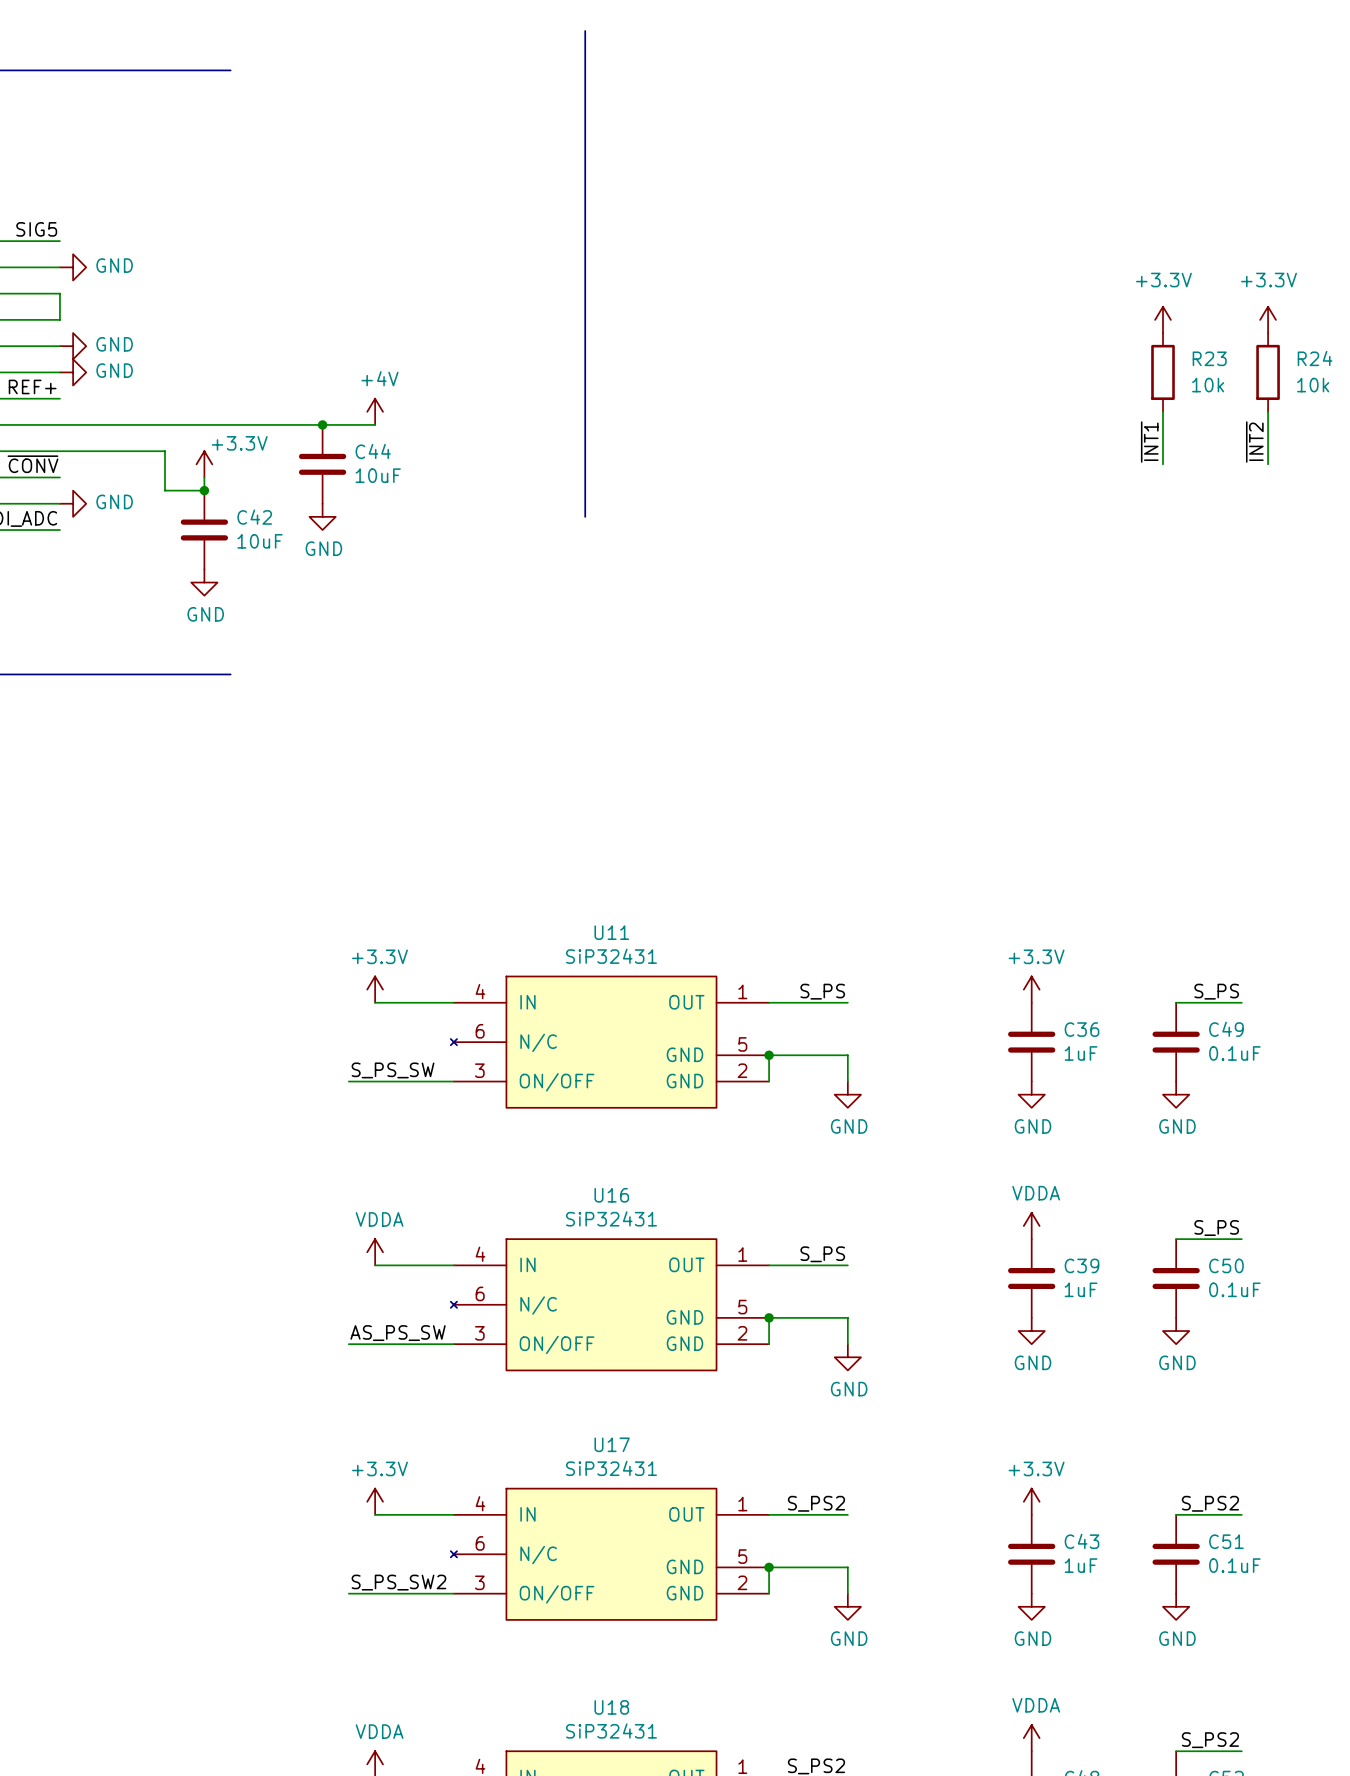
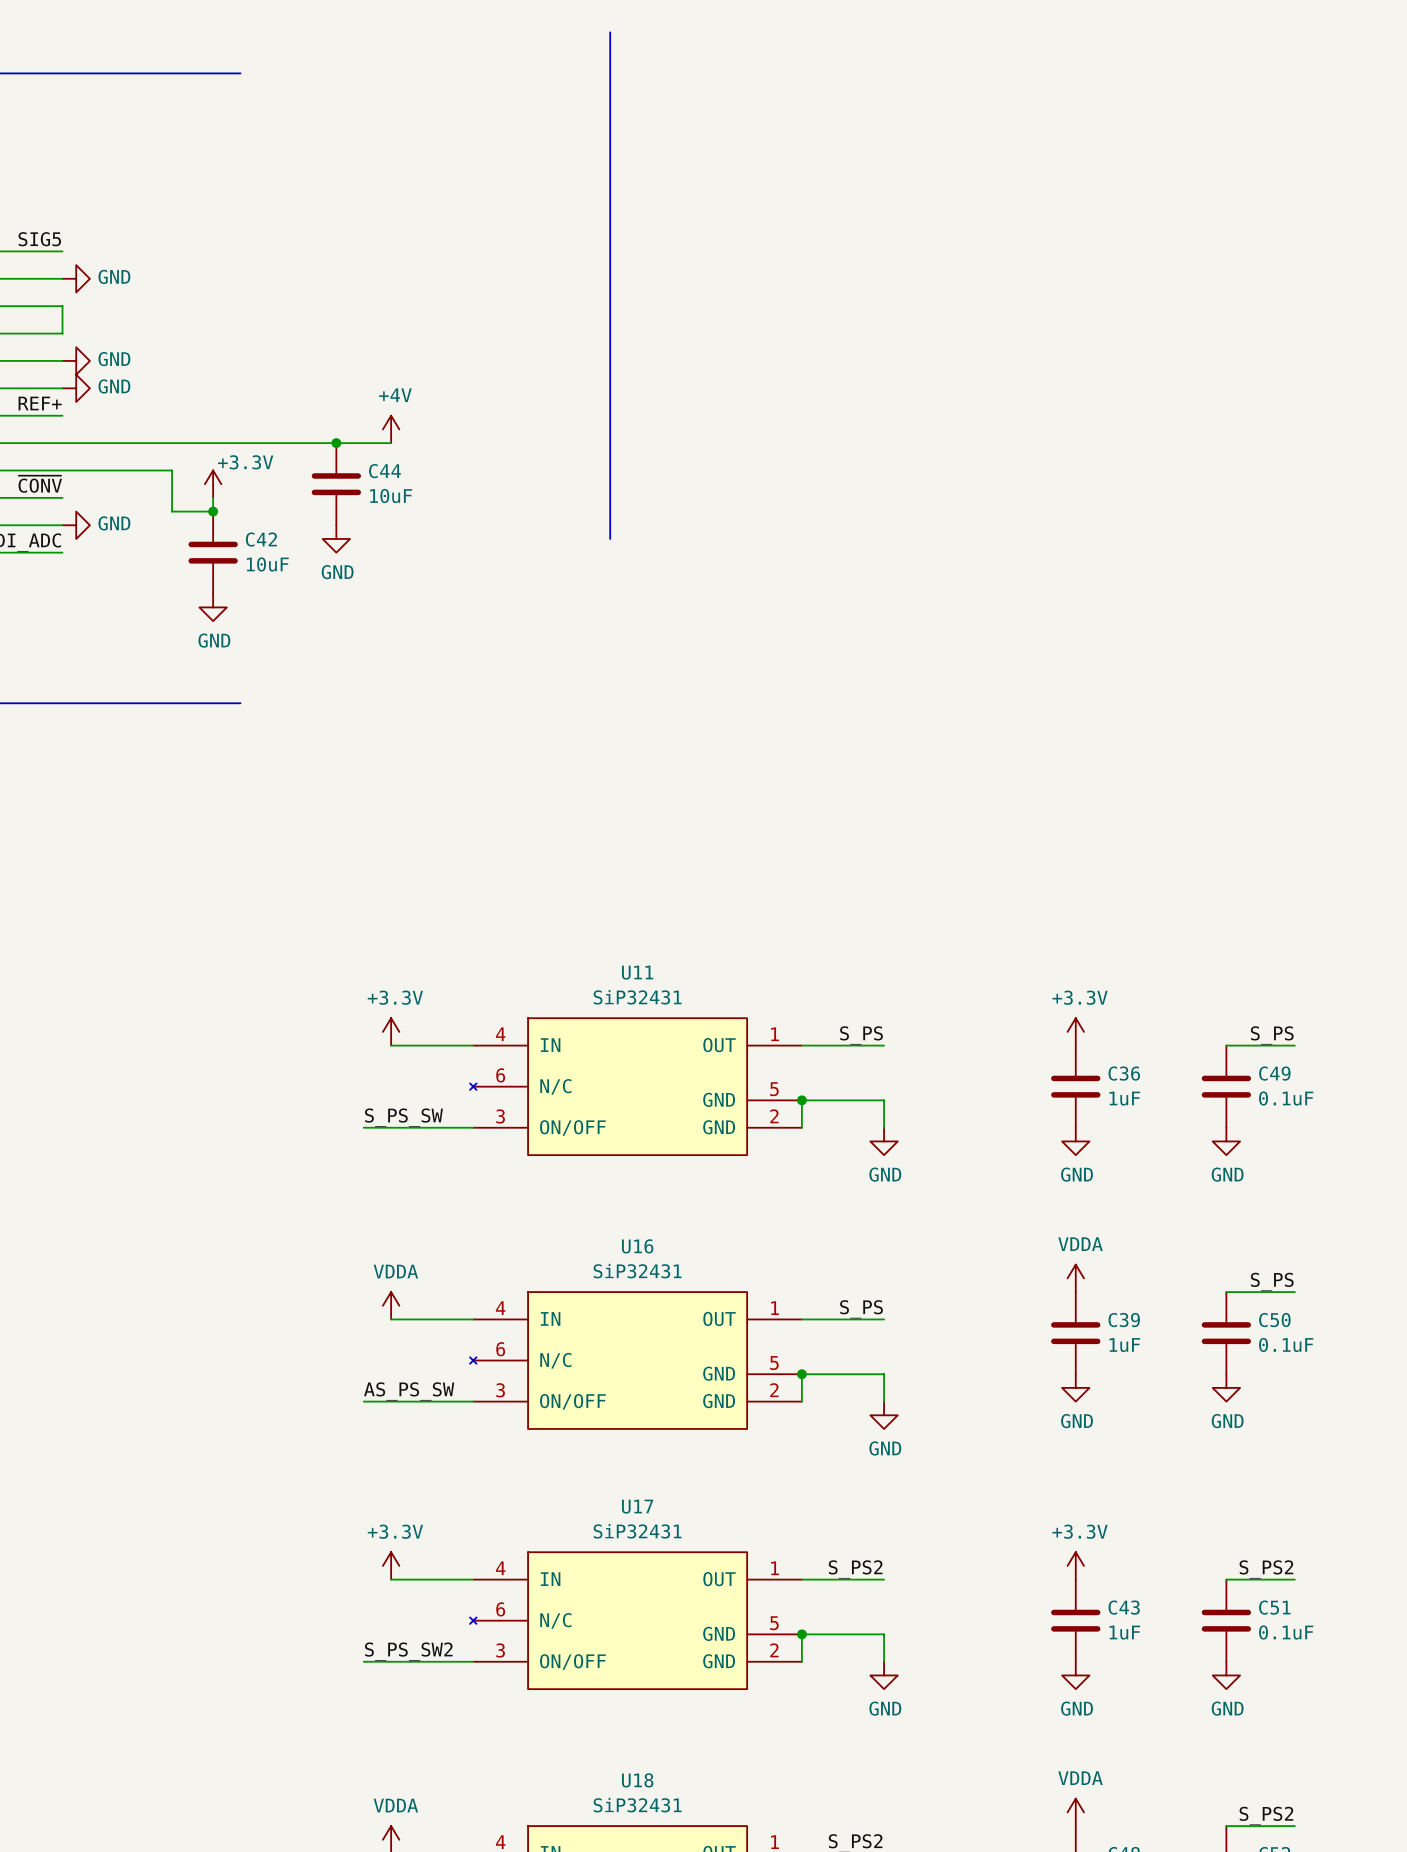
power symbol: +3.3V (1163, 319) -> none
power symbol: +3.3V (1268, 319) -> none
R23: 10k (1163, 372) -> none
R24: 10k (1268, 372) -> none
wire: (1163, 411) (1163, 464) -> none
wire: (1268, 411) (1268, 464) -> none
label: ~{INT1} (1149, 442) -> none
label: ~{INT2} (1254, 442) -> none

